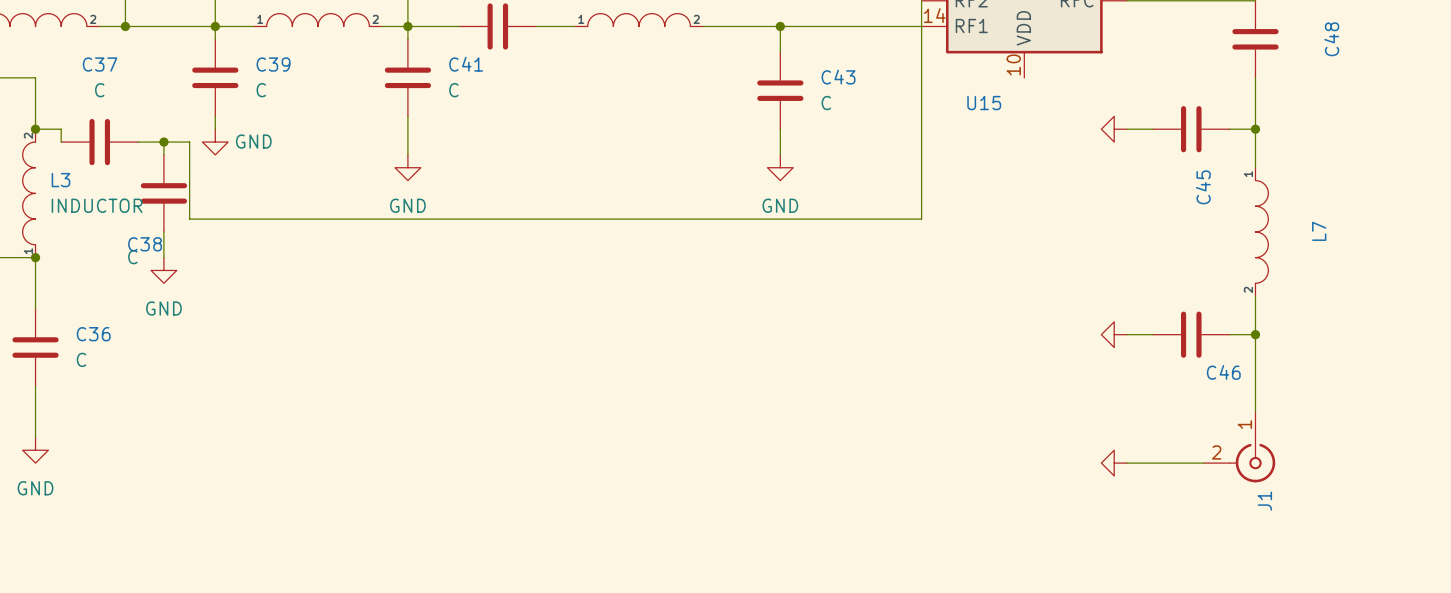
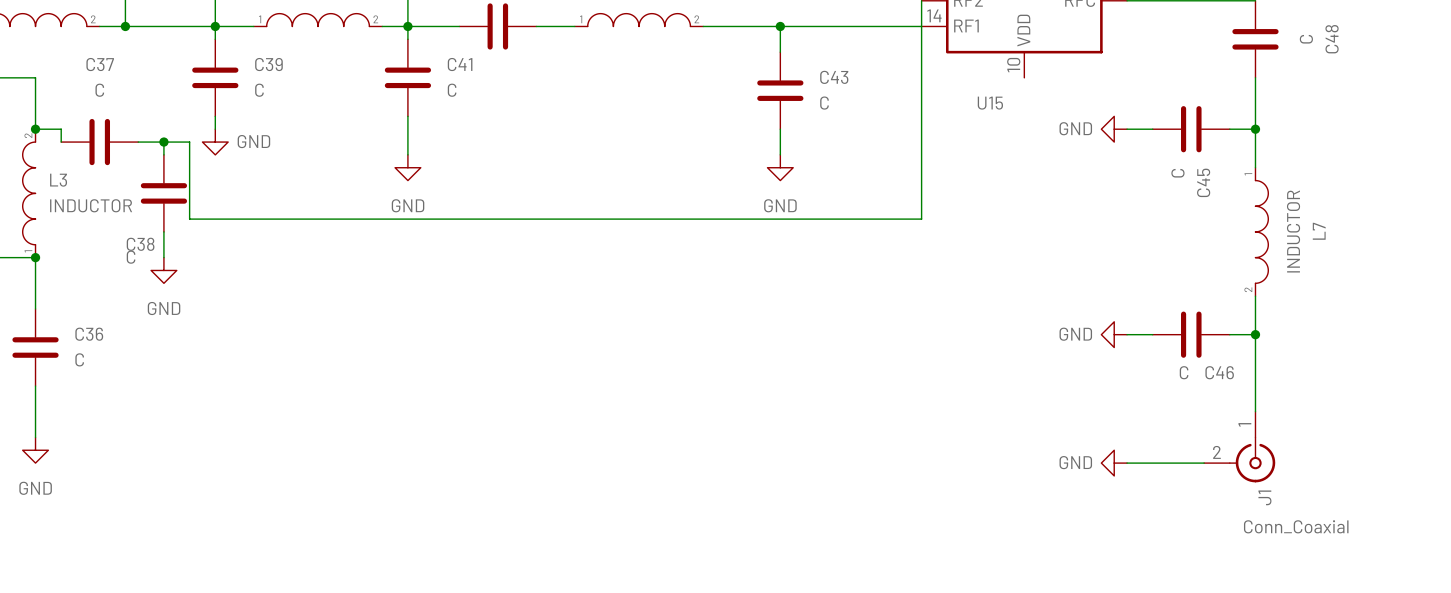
C48 value: none -> C (1306, 39)
power symbol text: none -> GND (1075, 128)
C45 value: none -> C (1177, 173)
L7 value: none -> INDUCTOR (1293, 231)
power symbol text: none -> GND (1075, 334)
C46 value: none -> C (1184, 372)
power symbol text: none -> GND (1075, 462)
J1 value: none -> Conn_Coaxial (1296, 526)

